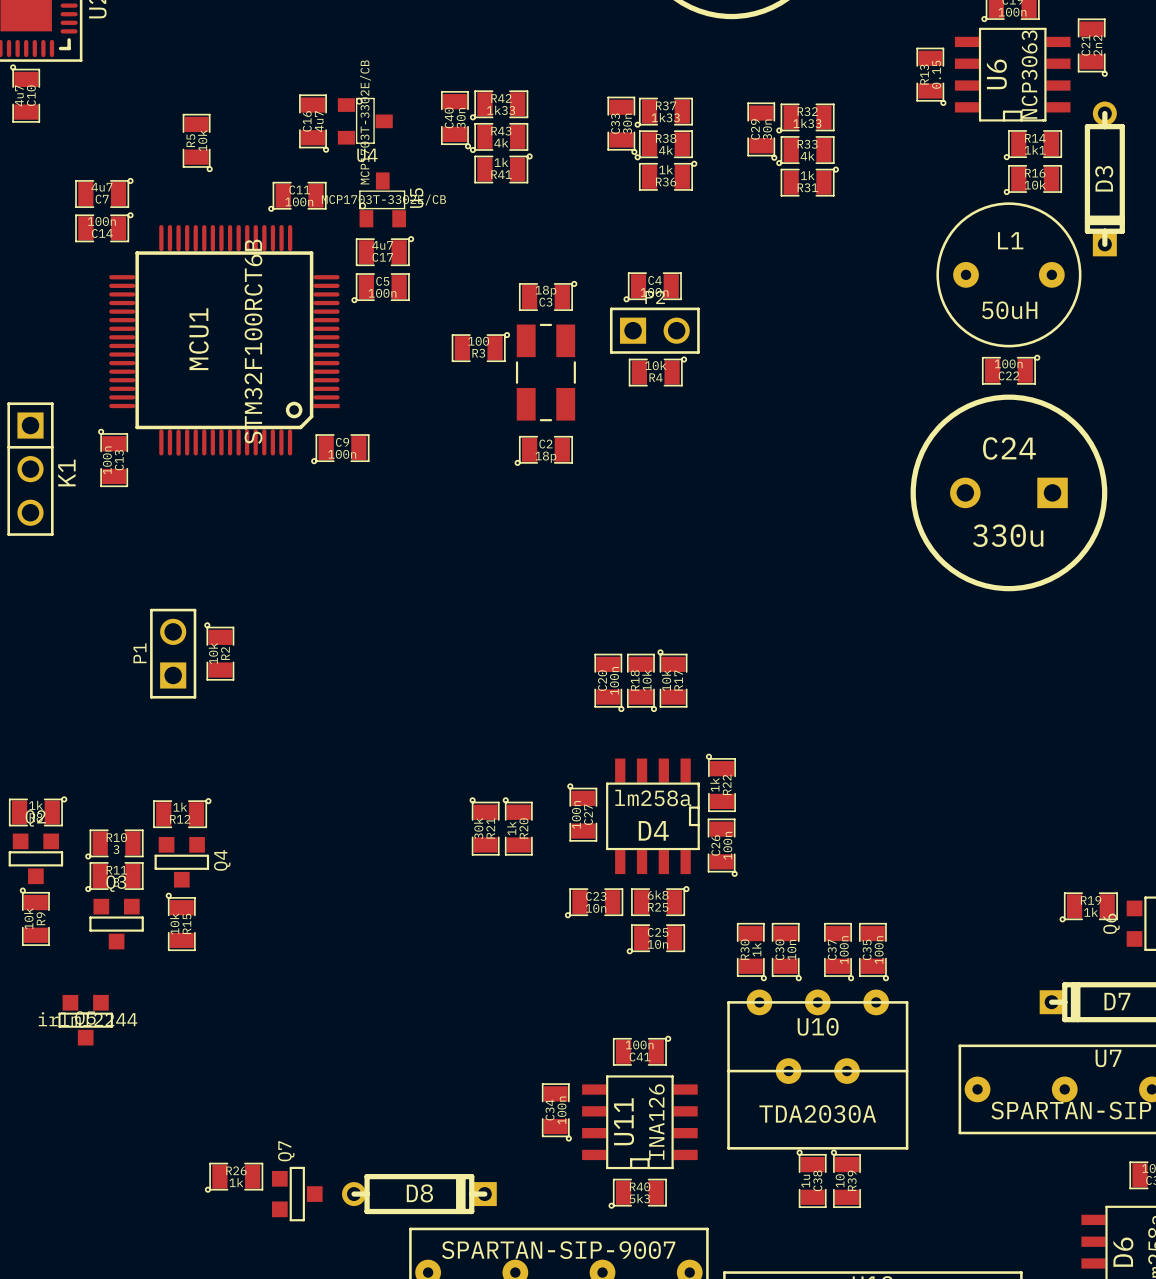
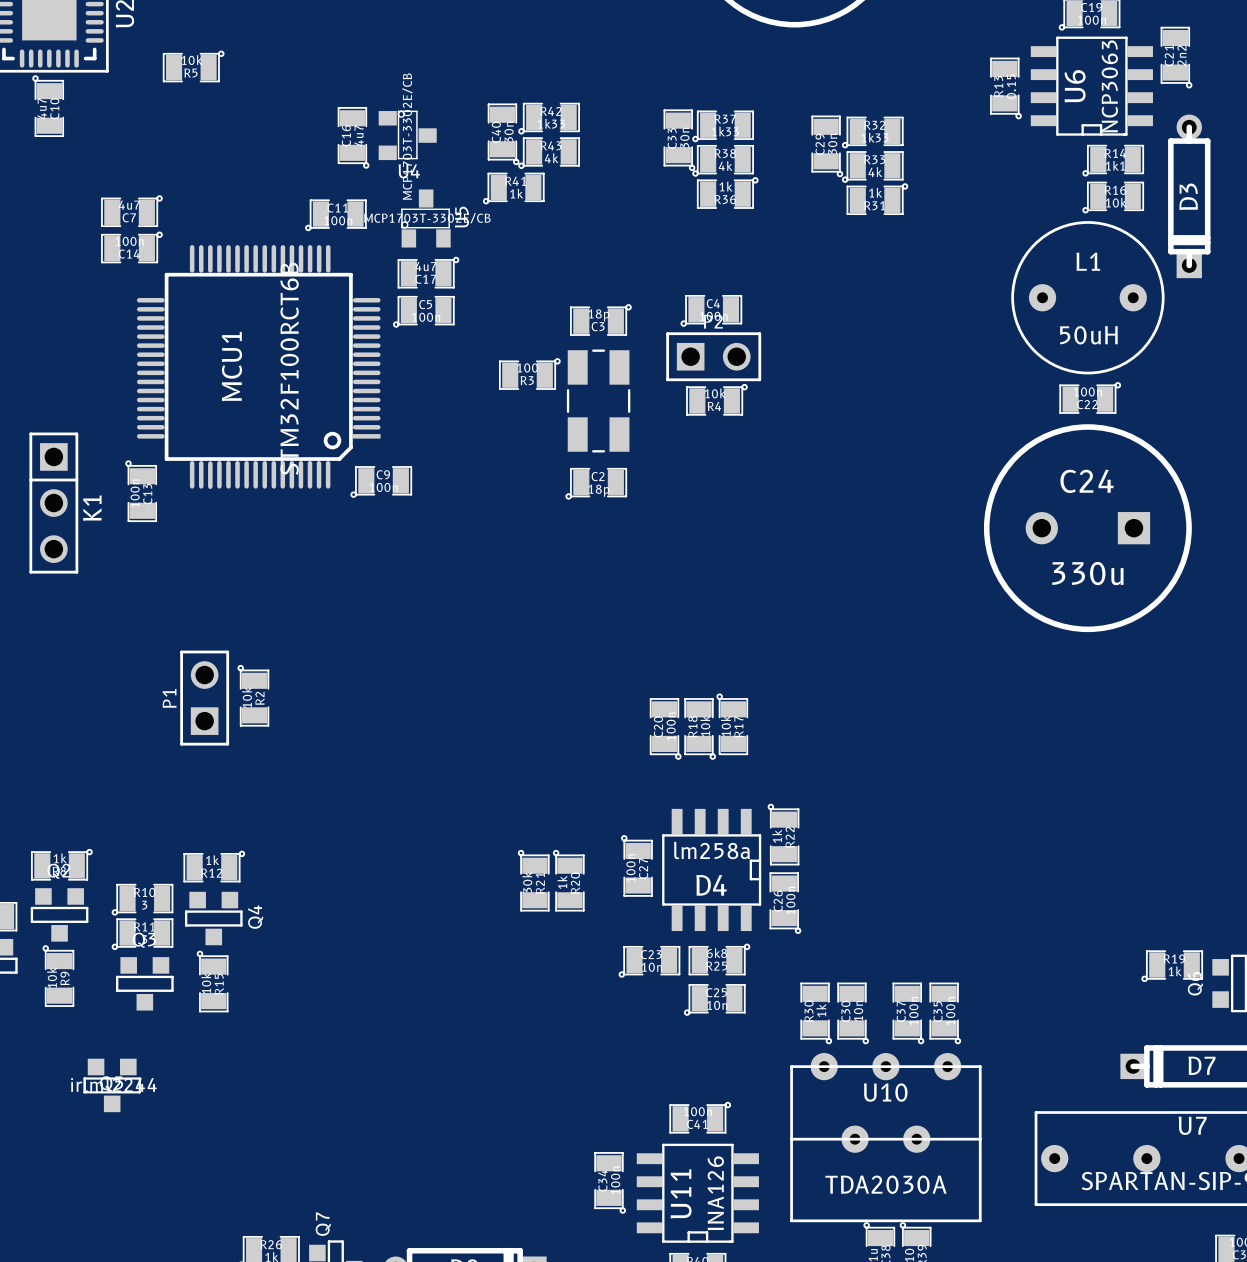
R5 rotation: 0° (197, 142) -> 90° counterclockwise (193, 66)
R5 position: (197, 142) -> (193, 66)
R41 rotation: 0° (503, 168) -> 180° (513, 188)
R41 position: (503, 168) -> (513, 188)

